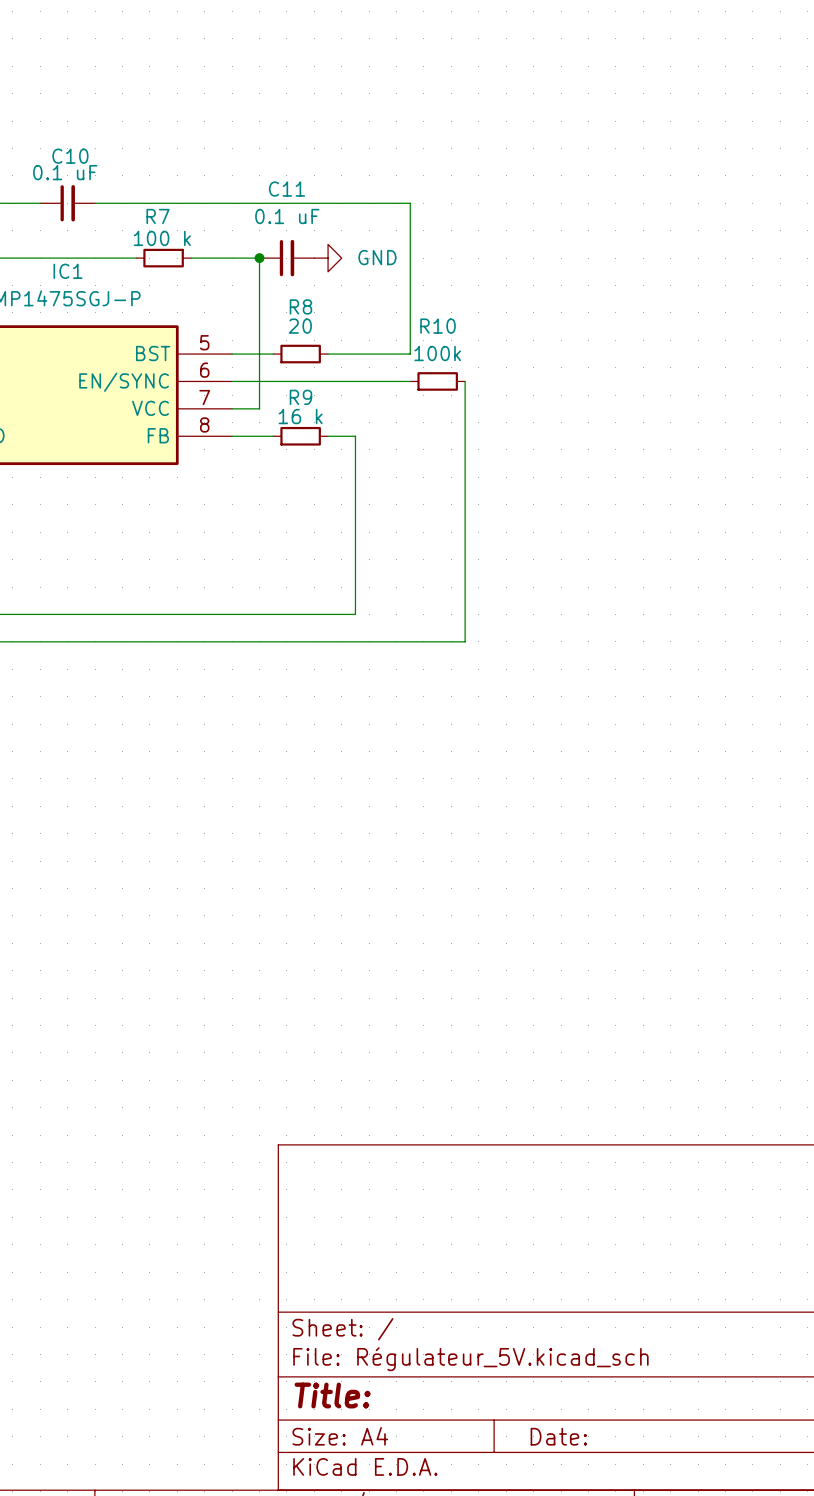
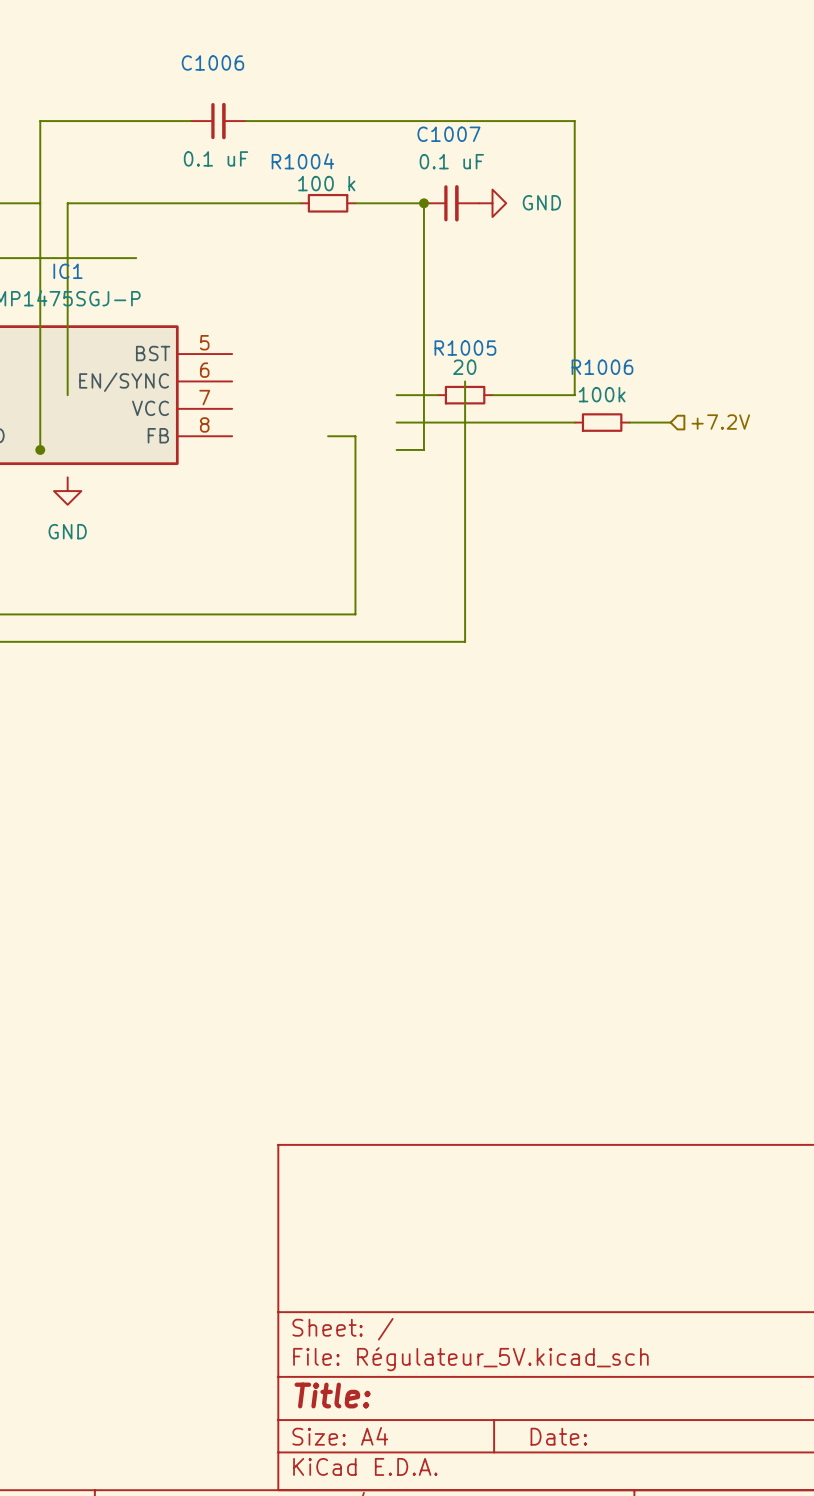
wire: none -> (191, 121) (40, 121) (40, 449)
C1006: none -> 0.1 uF (218, 121)
wire: none -> (245, 121) (574, 121) (574, 395) (492, 395)
C10: 0.1 uF (67, 203) -> none
wire: none -> (95, 203) (67, 203) (67, 395)
wire: (300, 203) (355, 203) -> none
R1004: none -> 100 k (328, 203)
wire: (410, 203) (410, 354) (328, 354) -> (410, 203) (423, 203) (423, 449) (396, 449)
junction: none -> (423, 203)
C1007: none -> 0.1 uF (451, 203)
R7: 100 k (163, 258) -> none
wire: (191, 258) (259, 258) (259, 408) (232, 408) -> none
junction: (259, 258) -> none
C11: 0.1 uF (286, 258) -> none
power symbol position: GND (328, 258) -> GND (492, 203)
wire: (232, 354) (273, 354) -> (396, 395) (437, 395)
R8: 20 (300, 354) -> none
wire: (232, 381) (410, 381) -> (396, 422) (574, 422)
R10: 100k (437, 381) -> none
R1005: none -> 20 (465, 395)
R1006: none -> 100k (602, 422)
wire: none -> (629, 422) (670, 422)
hierarchical label: none -> +7.2V (720, 422)
wire: (232, 436) (273, 436) -> none
R9: 16 k (300, 436) -> none
junction: none -> (40, 449)
power symbol: none -> GND (67, 491)

